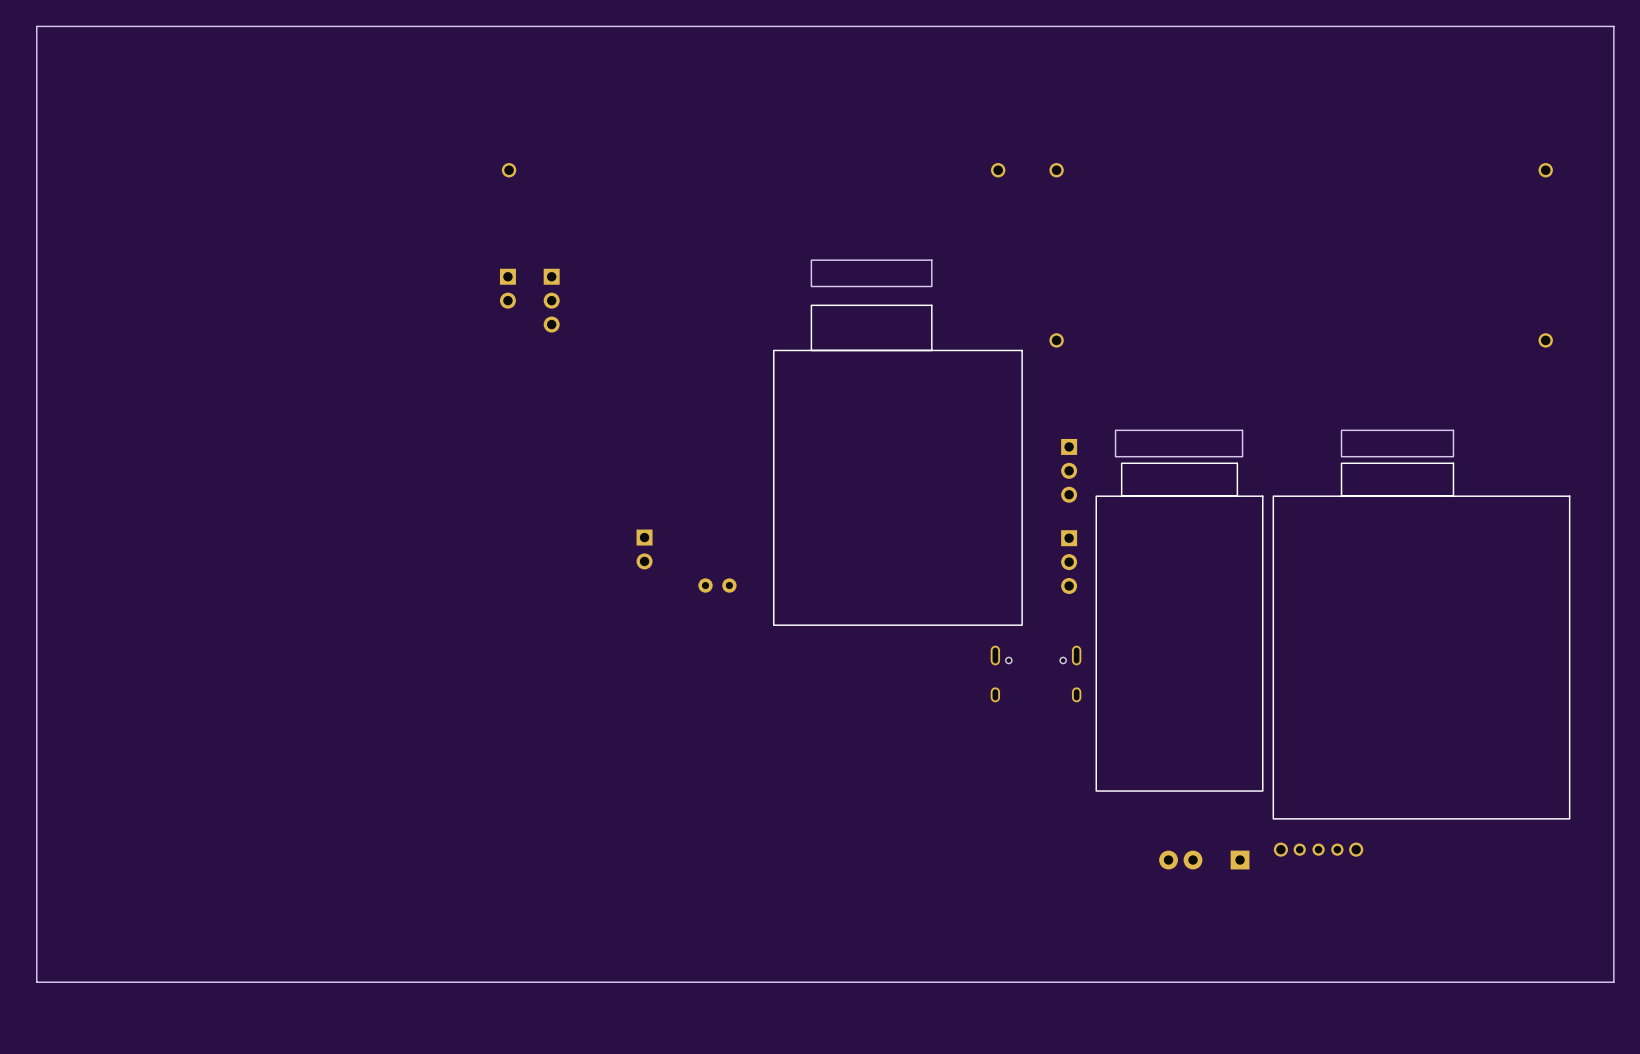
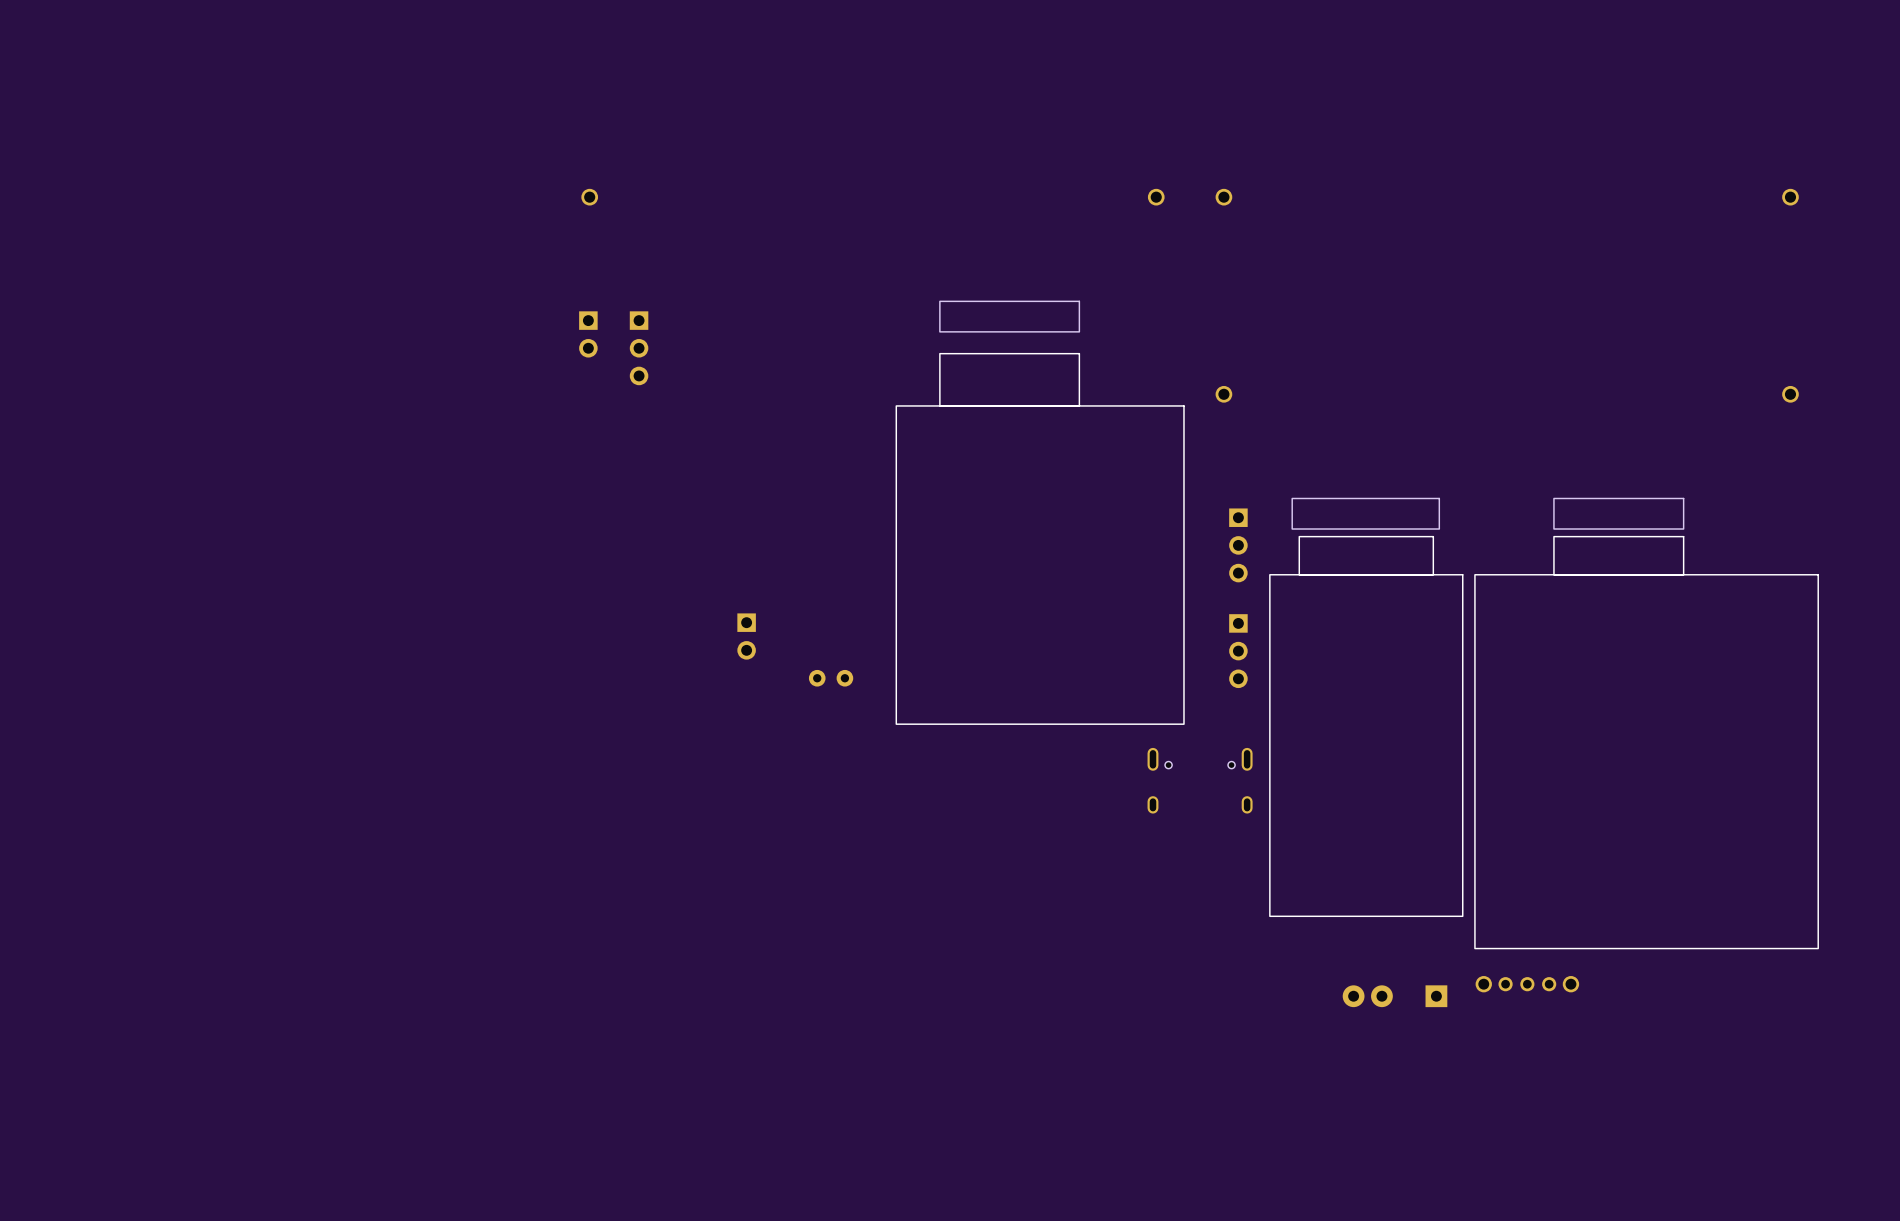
board edge: (1613, 26) (36, 26) (36, 982) (1613, 982) (1613, 26) -> none

